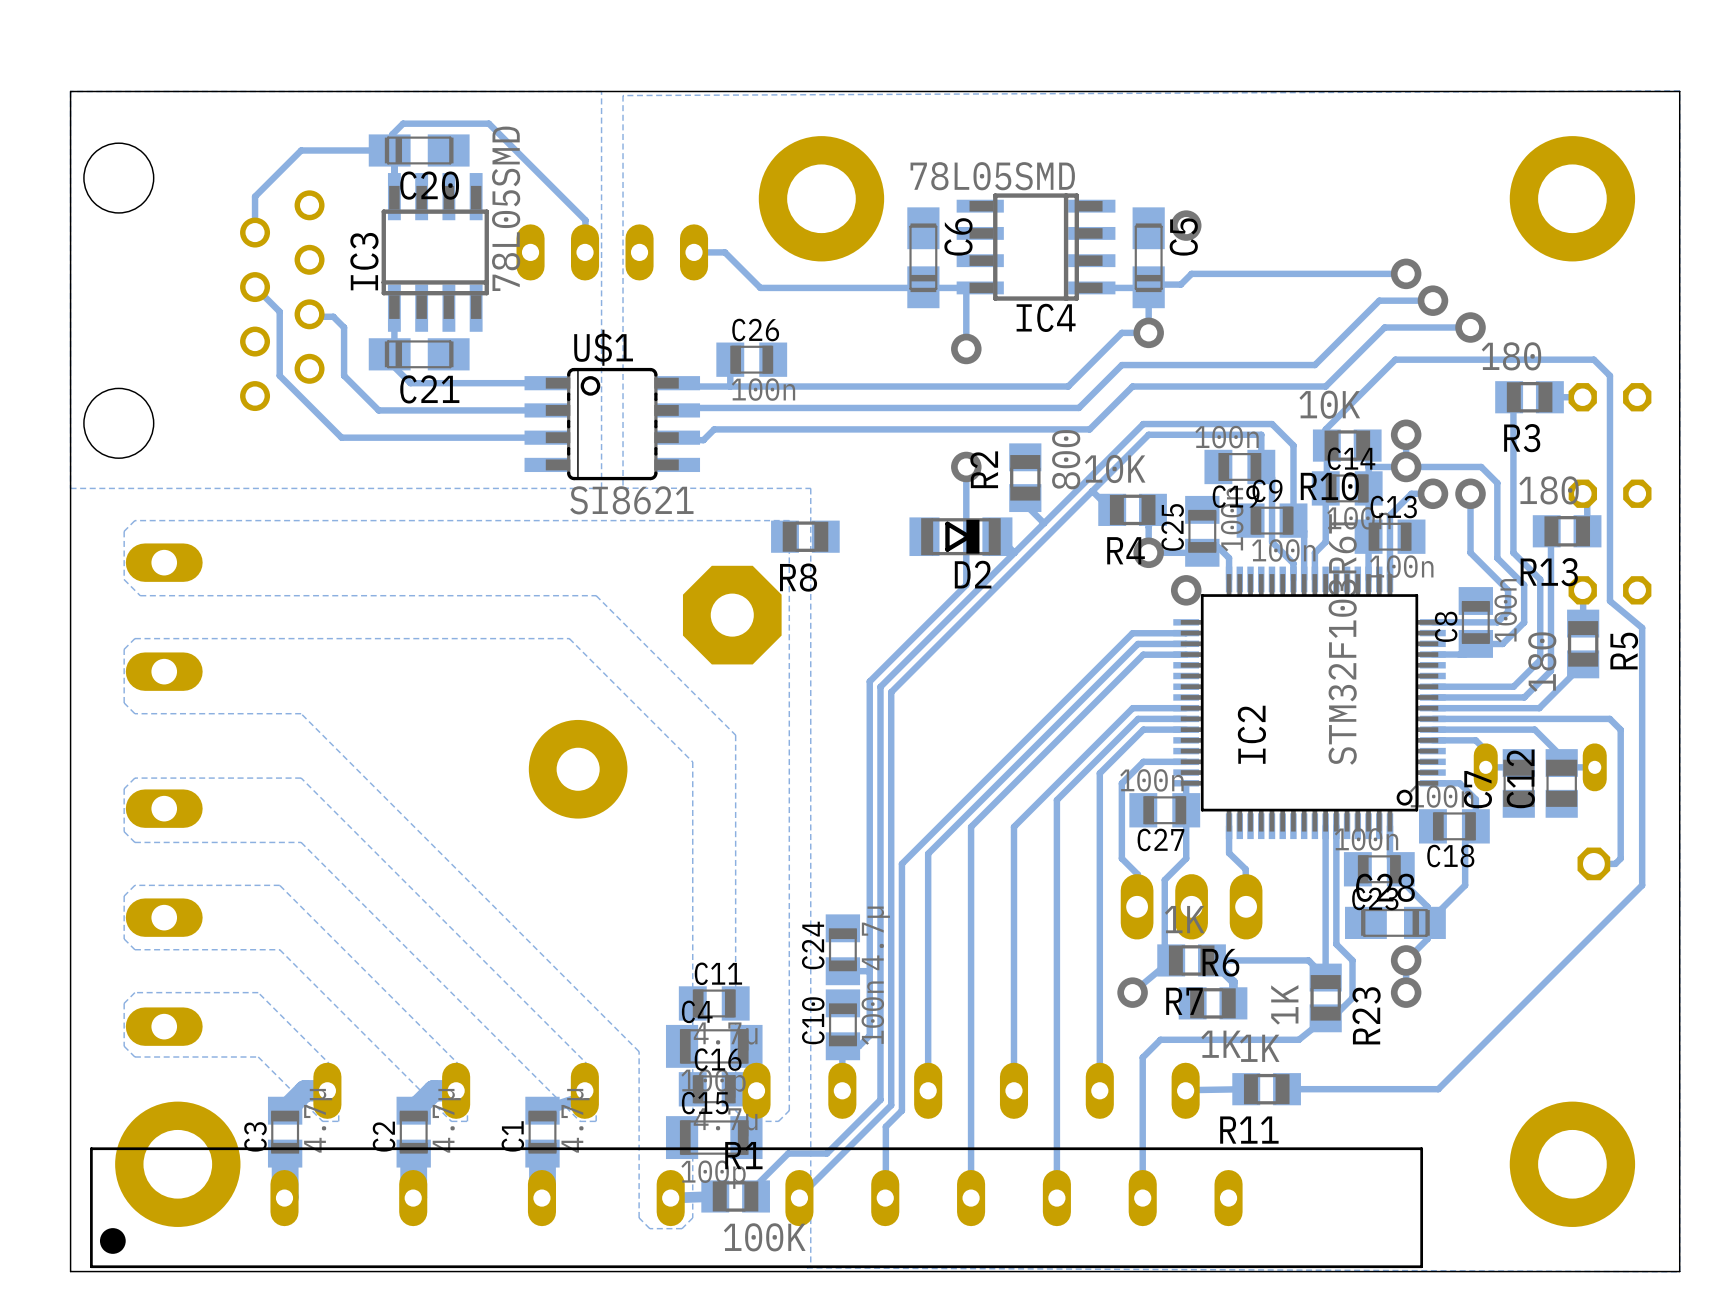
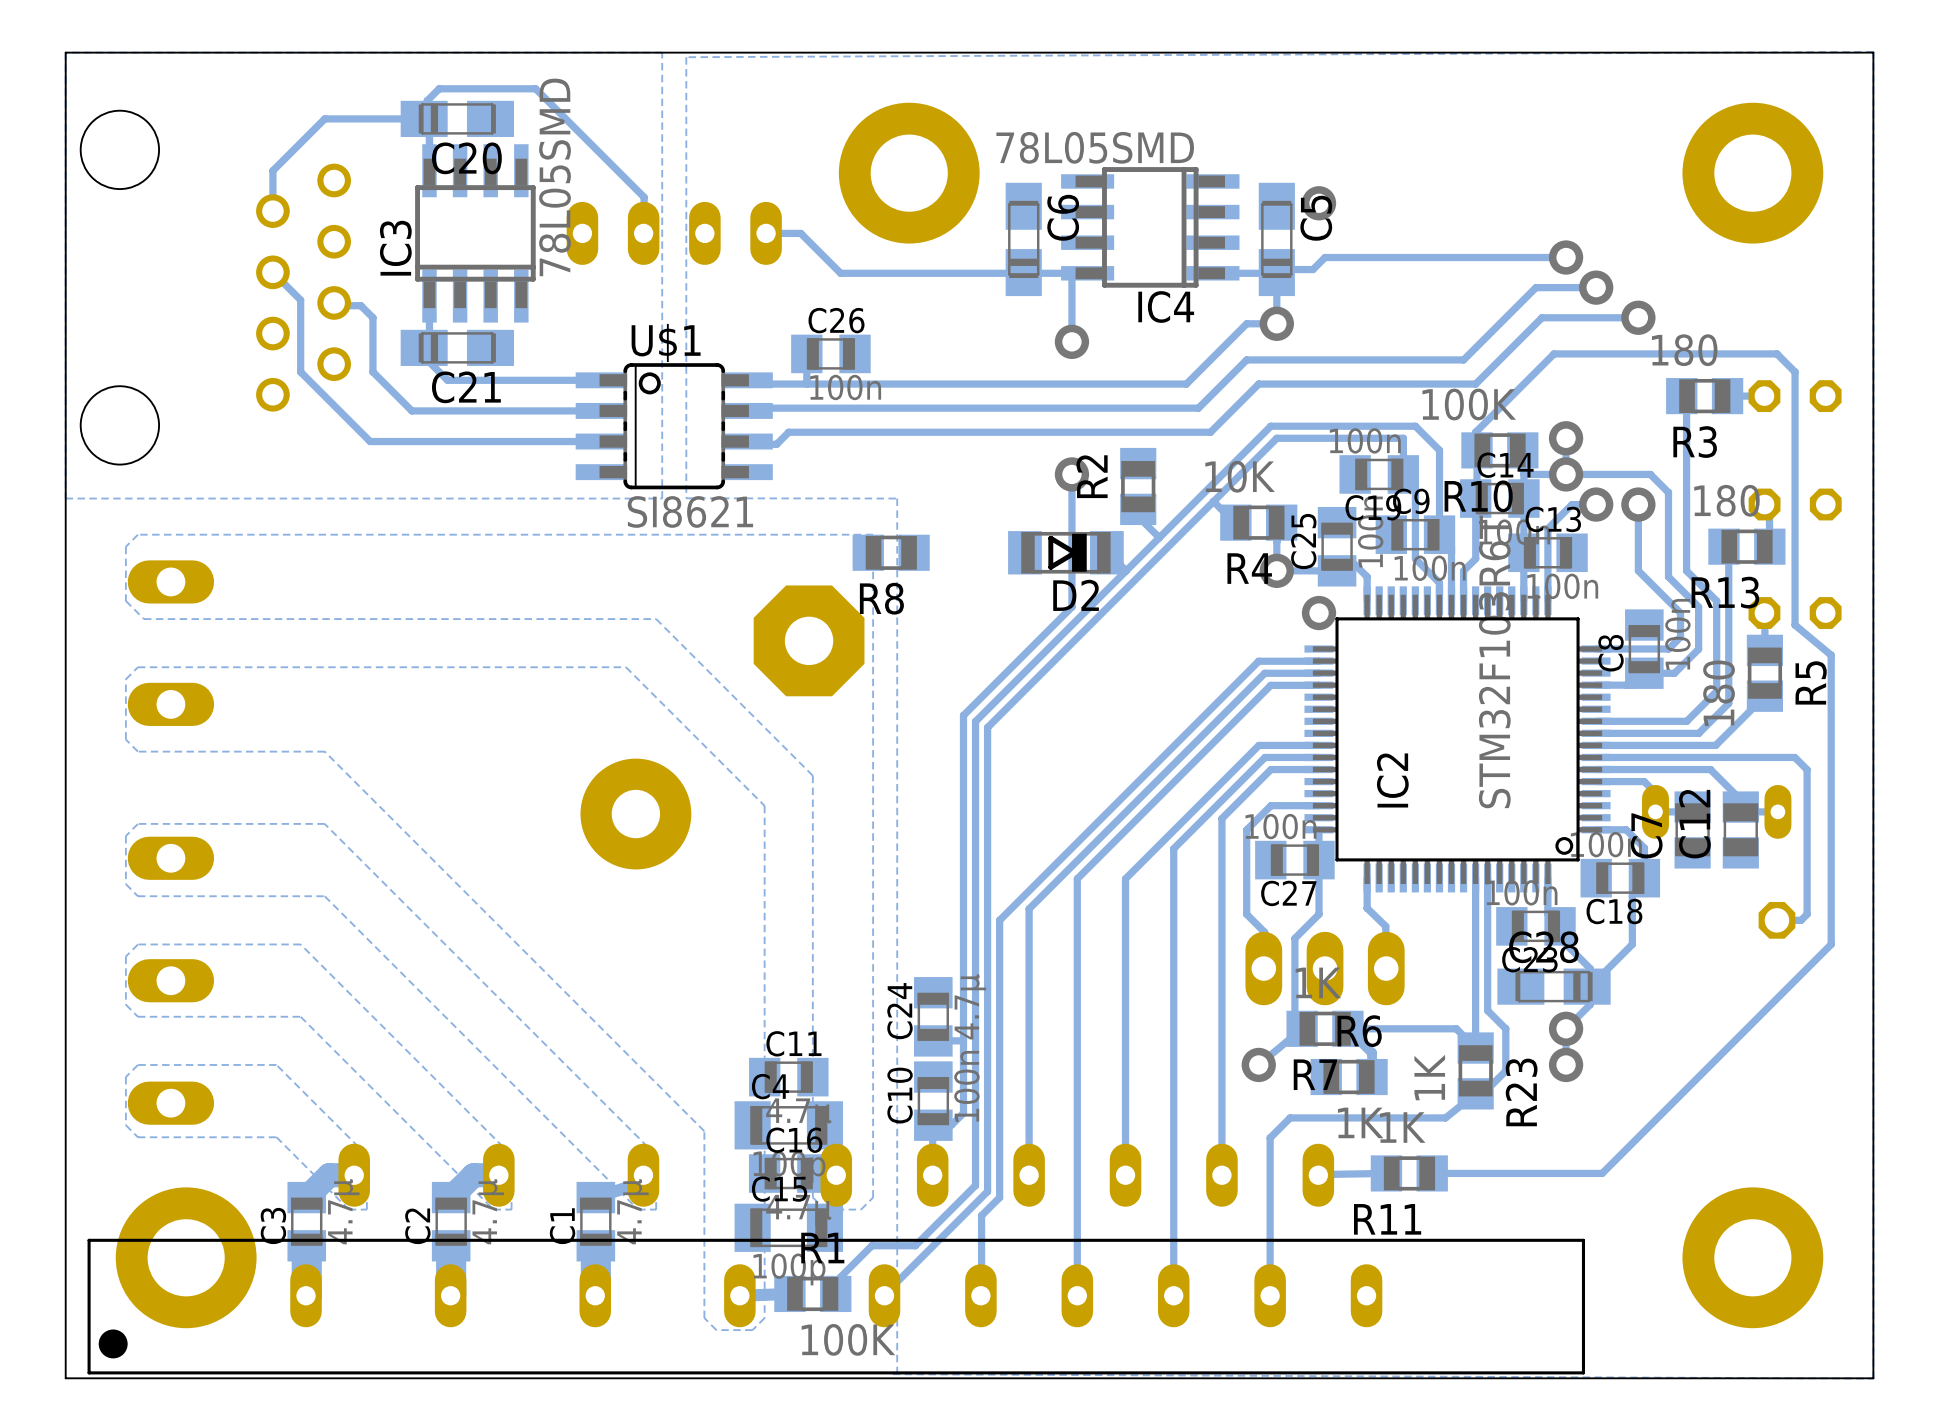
R10 value: 10K (1329, 404) -> 100K (1469, 404)
R2 value: 800 (1066, 459) -> none

